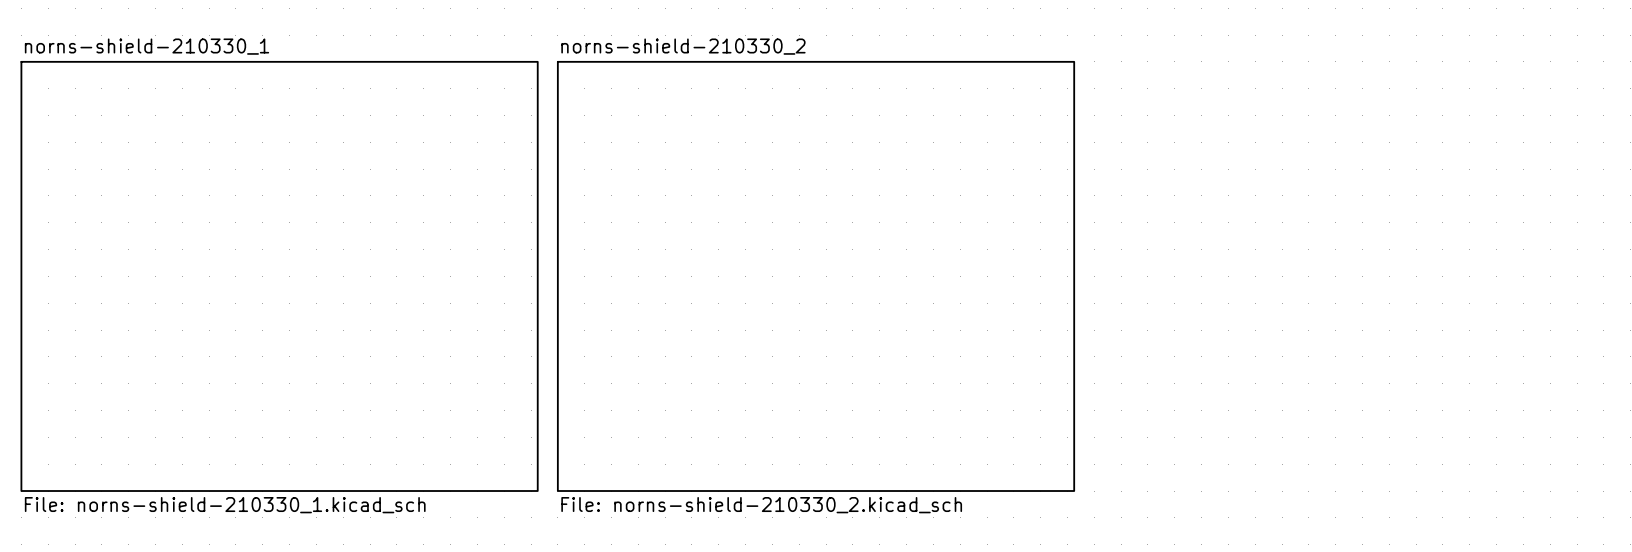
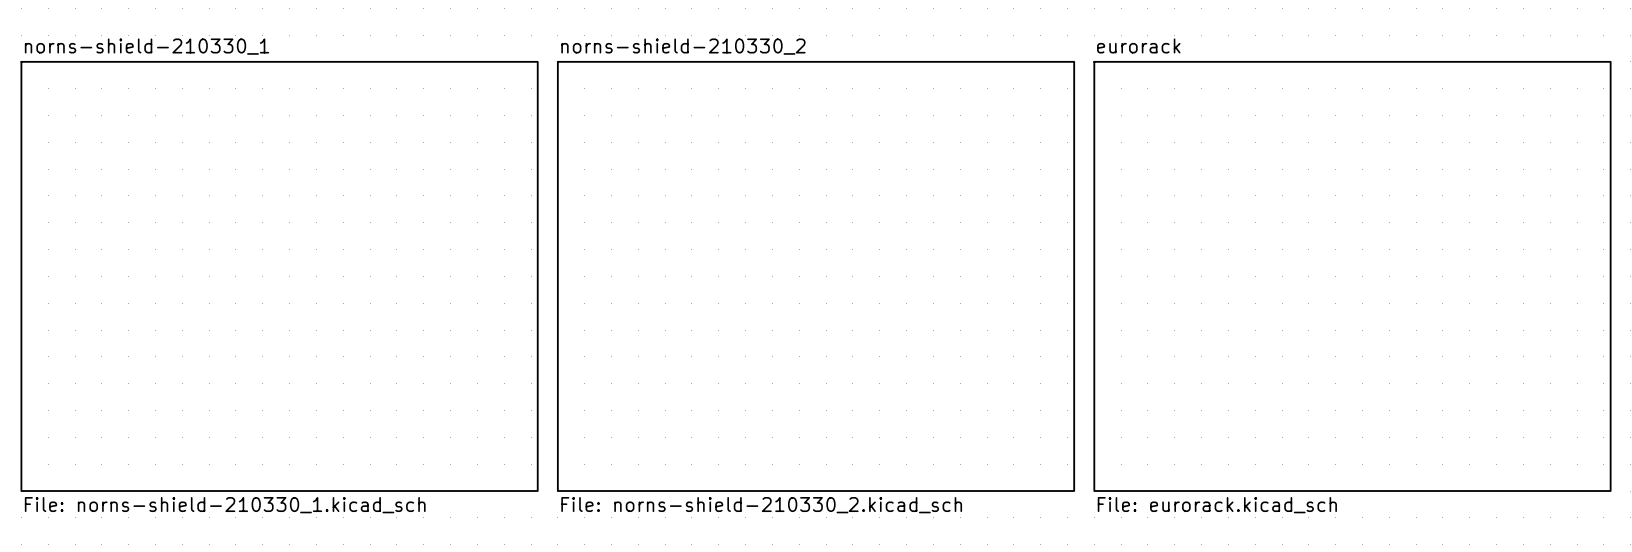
sheet eurorack: none -> File: eurorack.kicad_sch (1352, 276)

